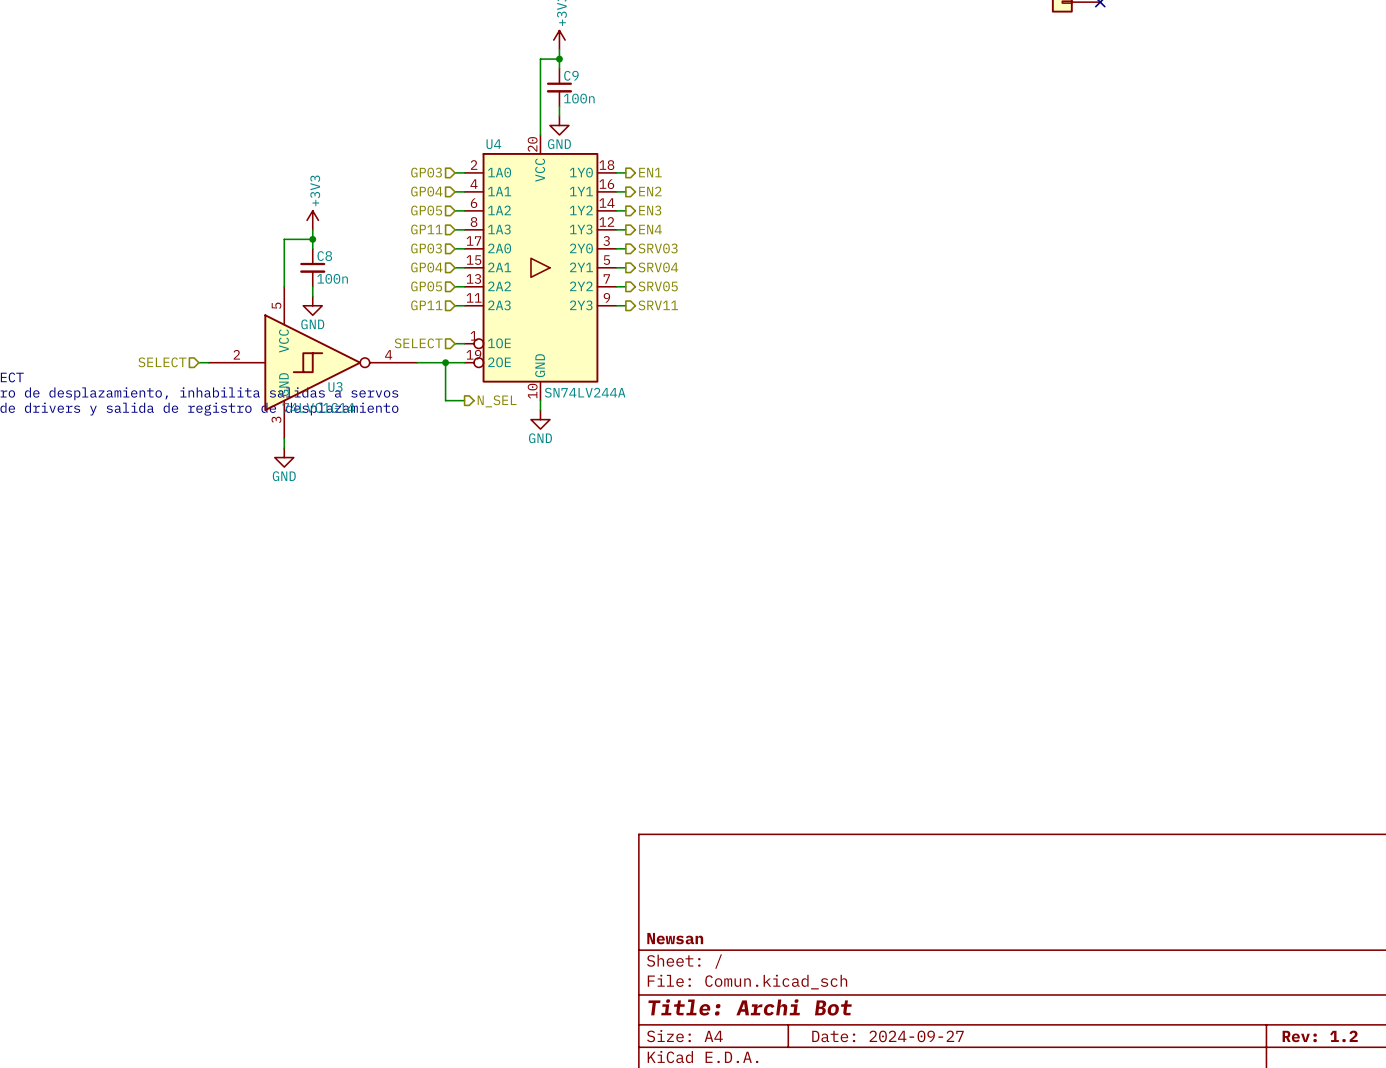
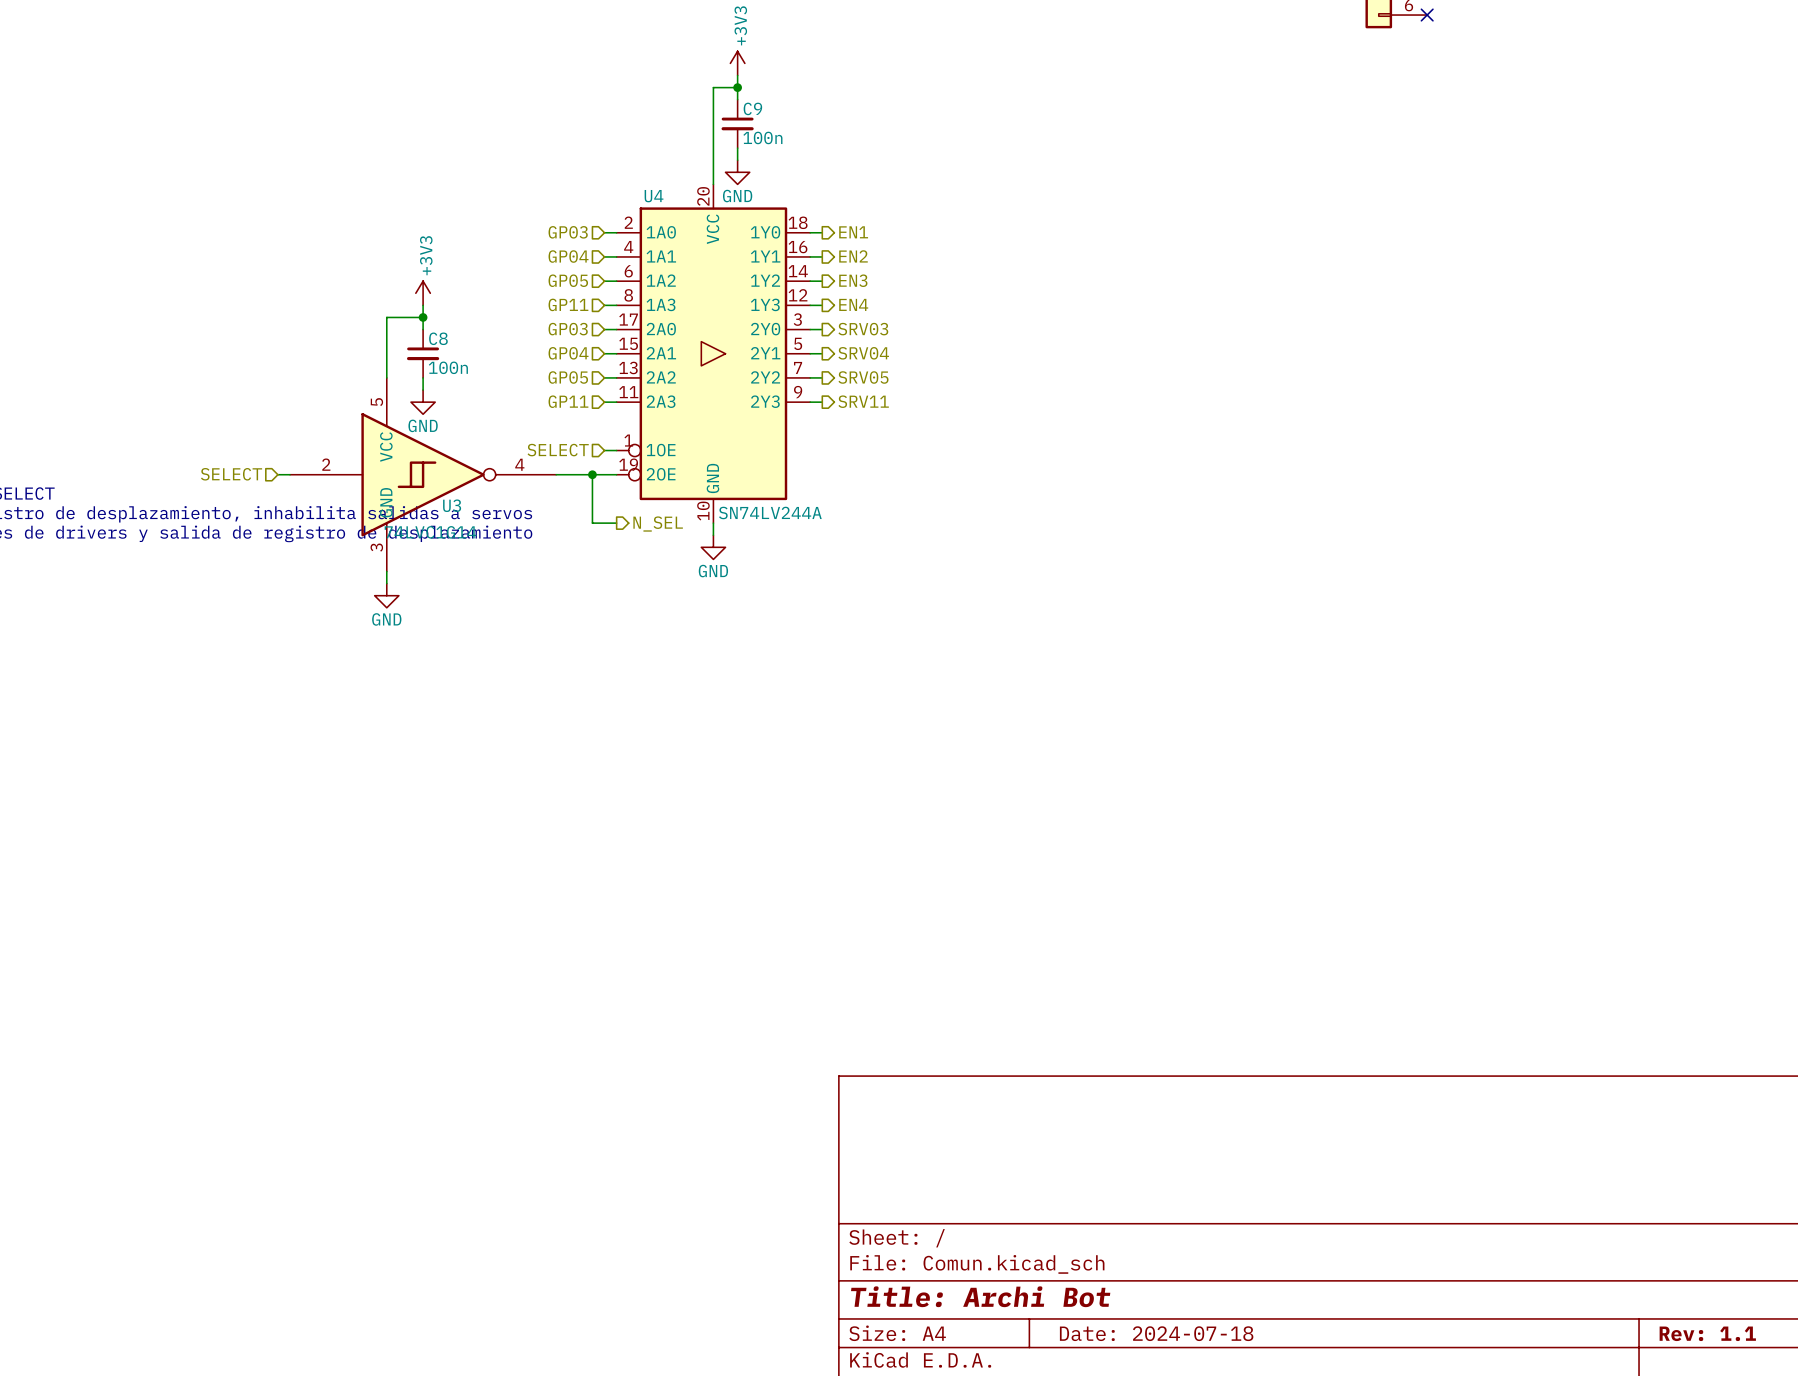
title block: Newsan (675, 938) -> none
title block: Date: 2024-09-27 (887, 1036) -> Date: 2024-07-18 (1156, 1333)
title block: Rev: 1.2 (1320, 1036) -> Rev: 1.1 (1707, 1333)

